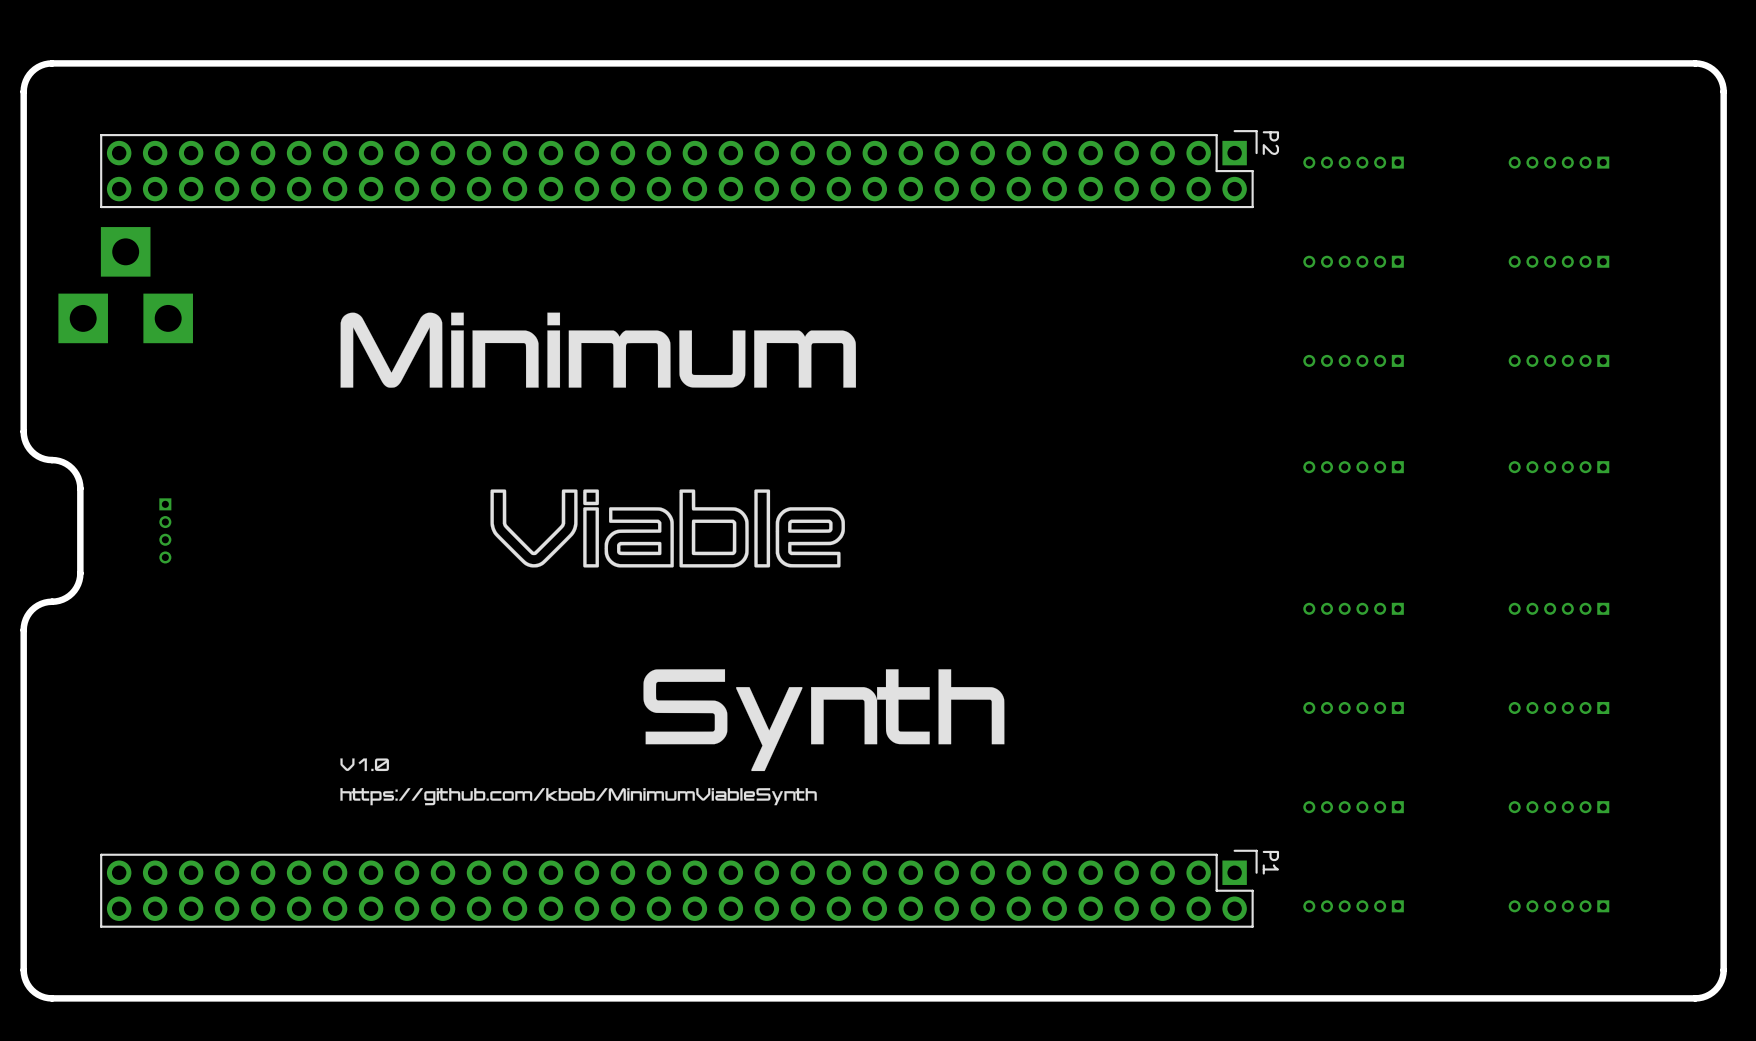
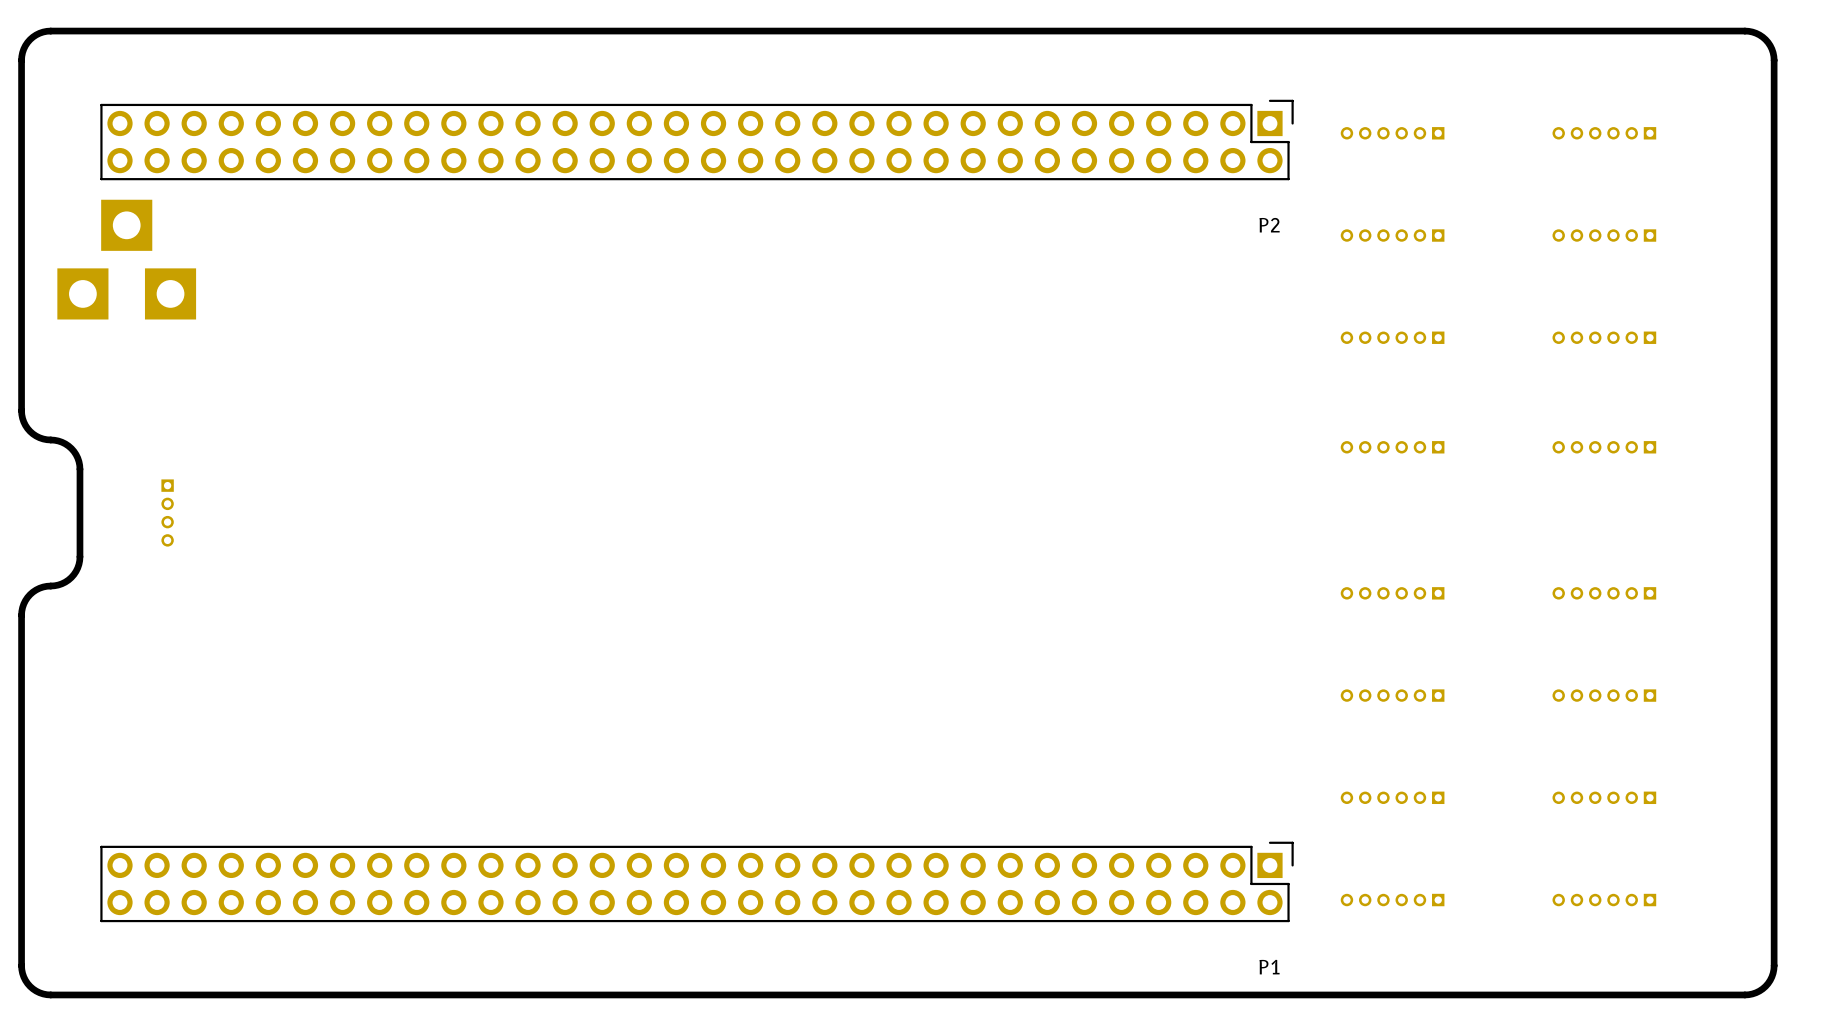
P2 name rotation: 0° (1270, 143) -> 90° counterclockwise (1269, 225)
P2 name position: P2 (1270, 143) -> P2 (1269, 225)
drawing: [340, 312, 1005, 806] -> none
P1 name rotation: 0° (1270, 862) -> 90° counterclockwise (1269, 967)
P1 name position: P1 (1270, 862) -> P1 (1269, 967)

